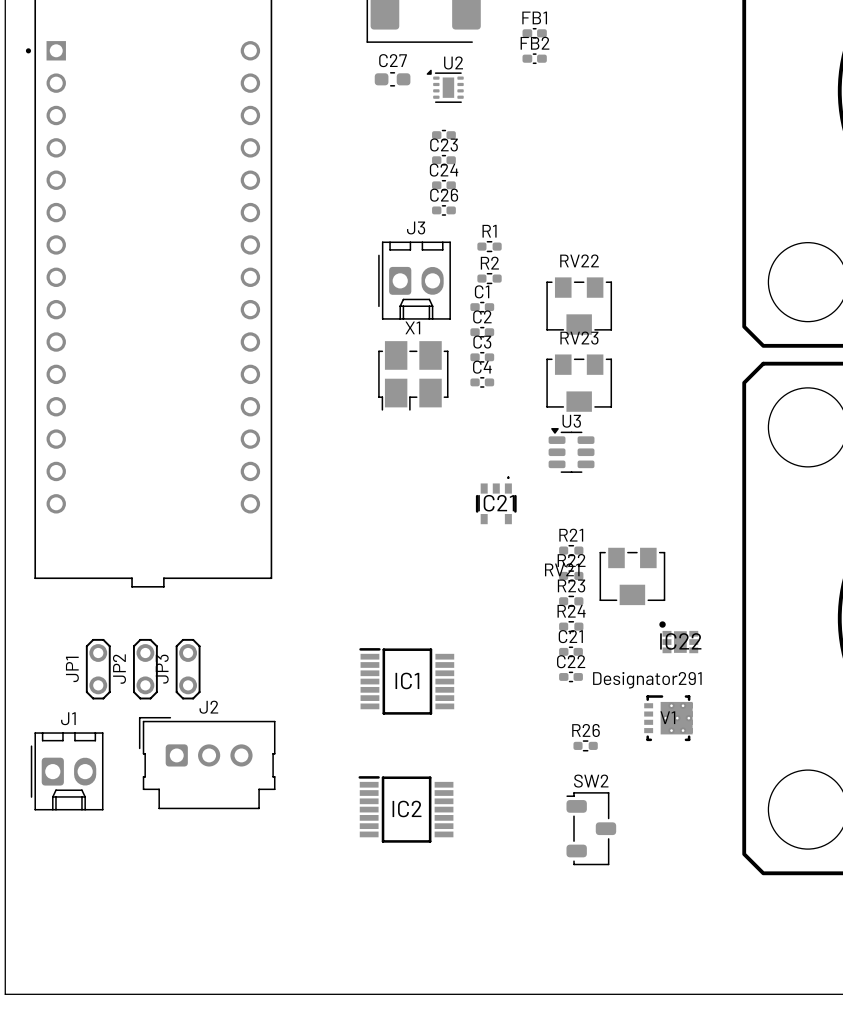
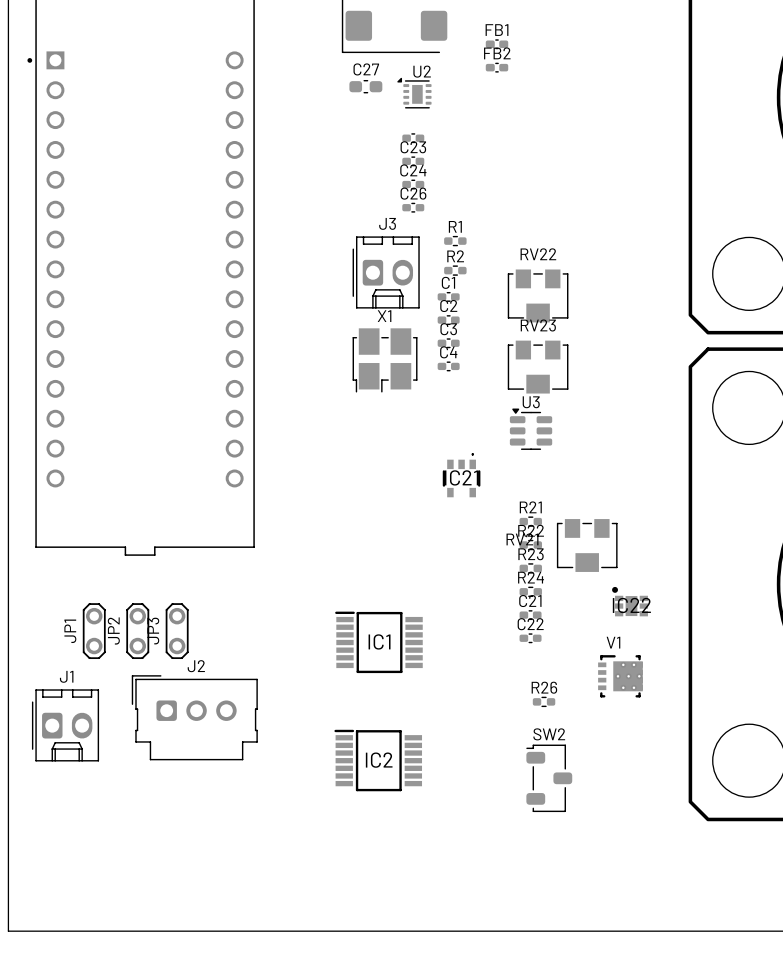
V1 text: Designator291 (647, 680) -> none
V1 name position: V1 (667, 717) -> V1 (613, 642)

